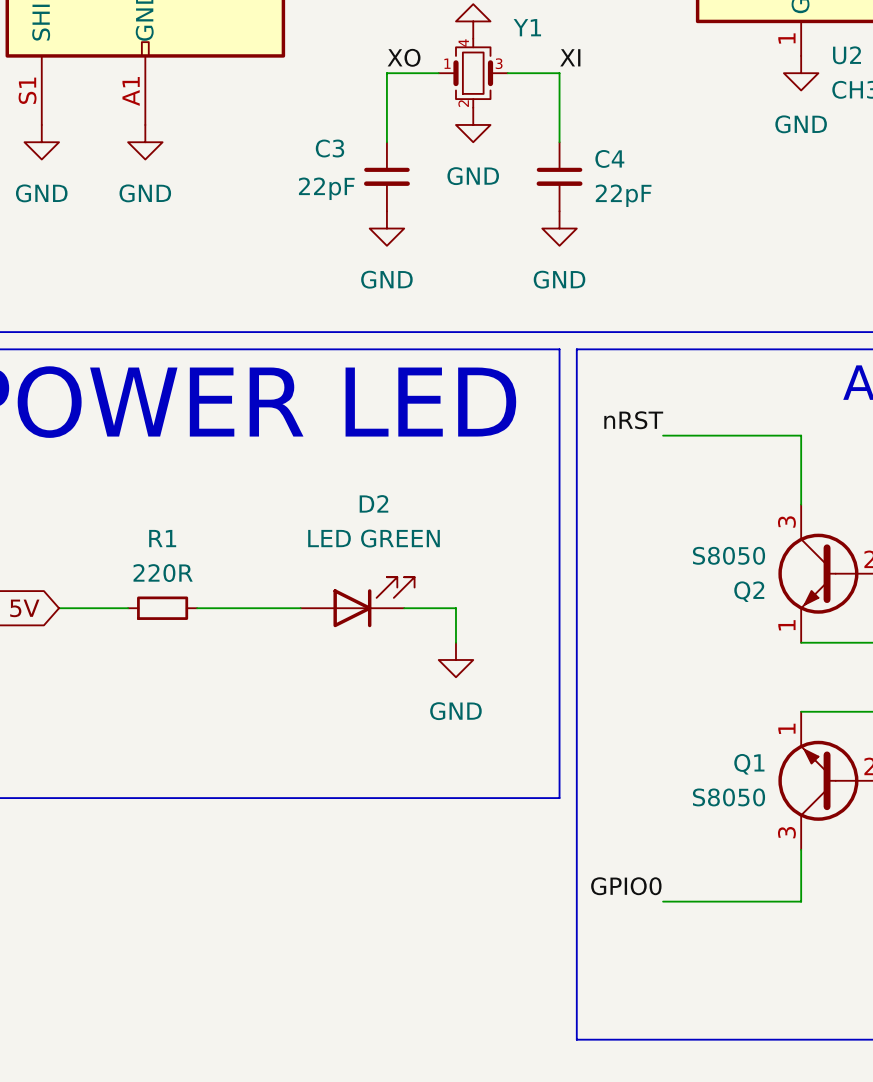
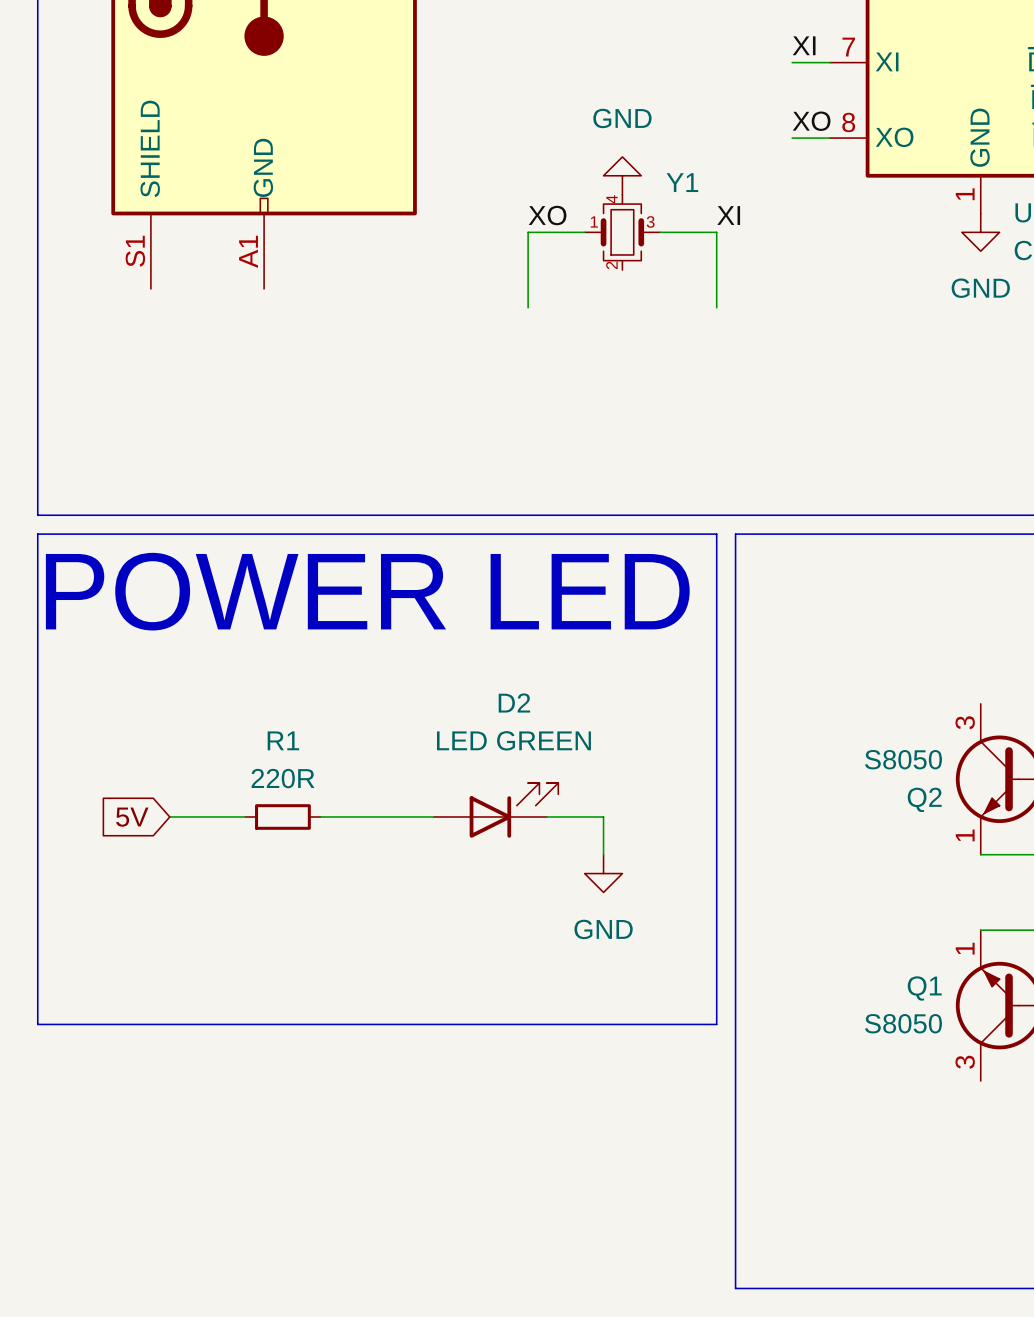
power symbol: GND (473, 124) -> none
power symbol: GND (41, 142) -> none
power symbol: GND (145, 142) -> none
C3: 22pF (386, 176) -> none
C4: 22pF (559, 176) -> none
power symbol: GND (386, 228) -> none
power symbol: GND (559, 228) -> none
label: nRST (633, 420) -> none
wire: (663, 435) (801, 435) (801, 504) -> none
wire: (801, 849) (801, 901) (663, 901) -> none
label: GPIO0 (626, 886) -> none

